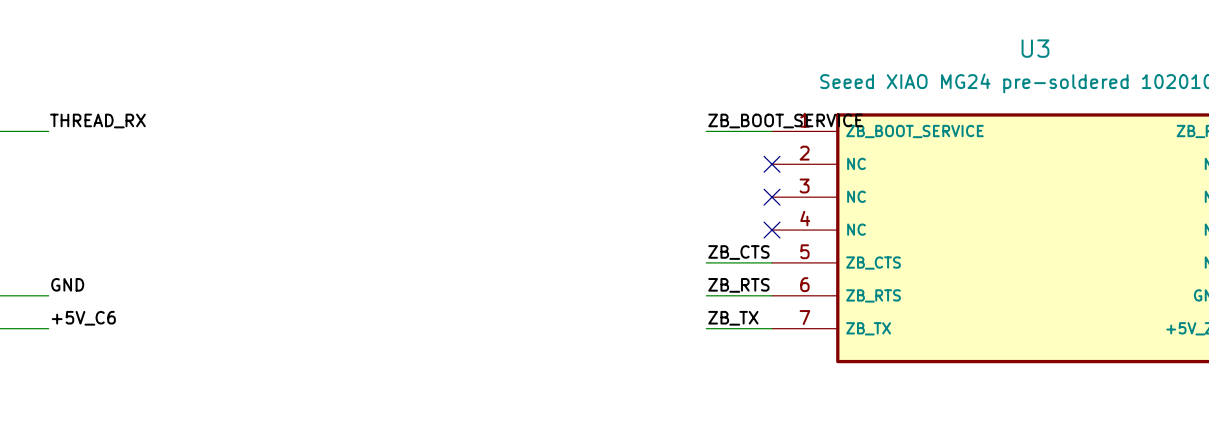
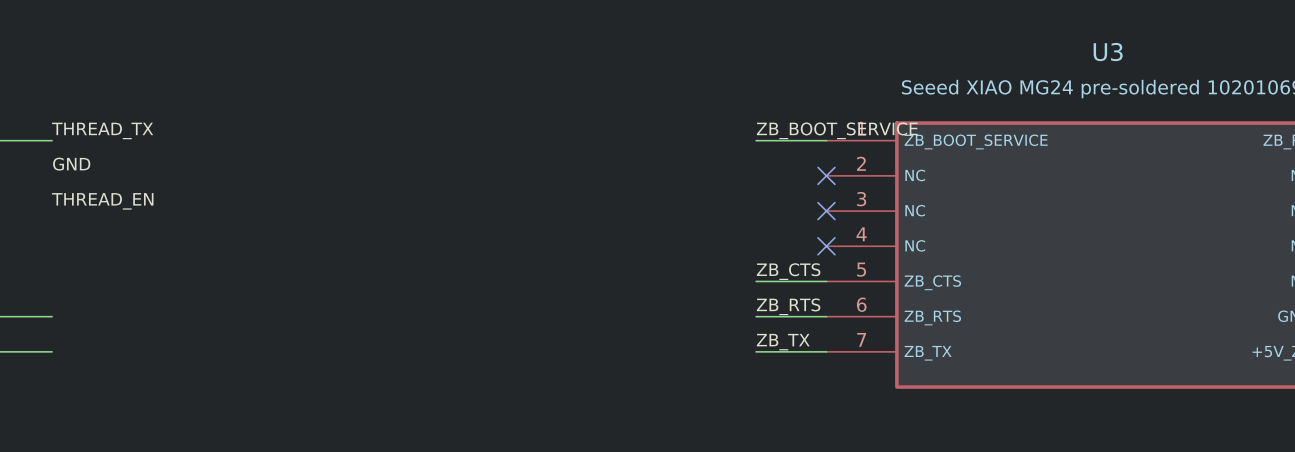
label: THREAD_RX (97, 120) -> THREAD_TX (102, 130)
label: none -> THREAD_EN (102, 201)
label position: GND (67, 284) -> GND (71, 164)
label: +5V_C6 (83, 318) -> none

